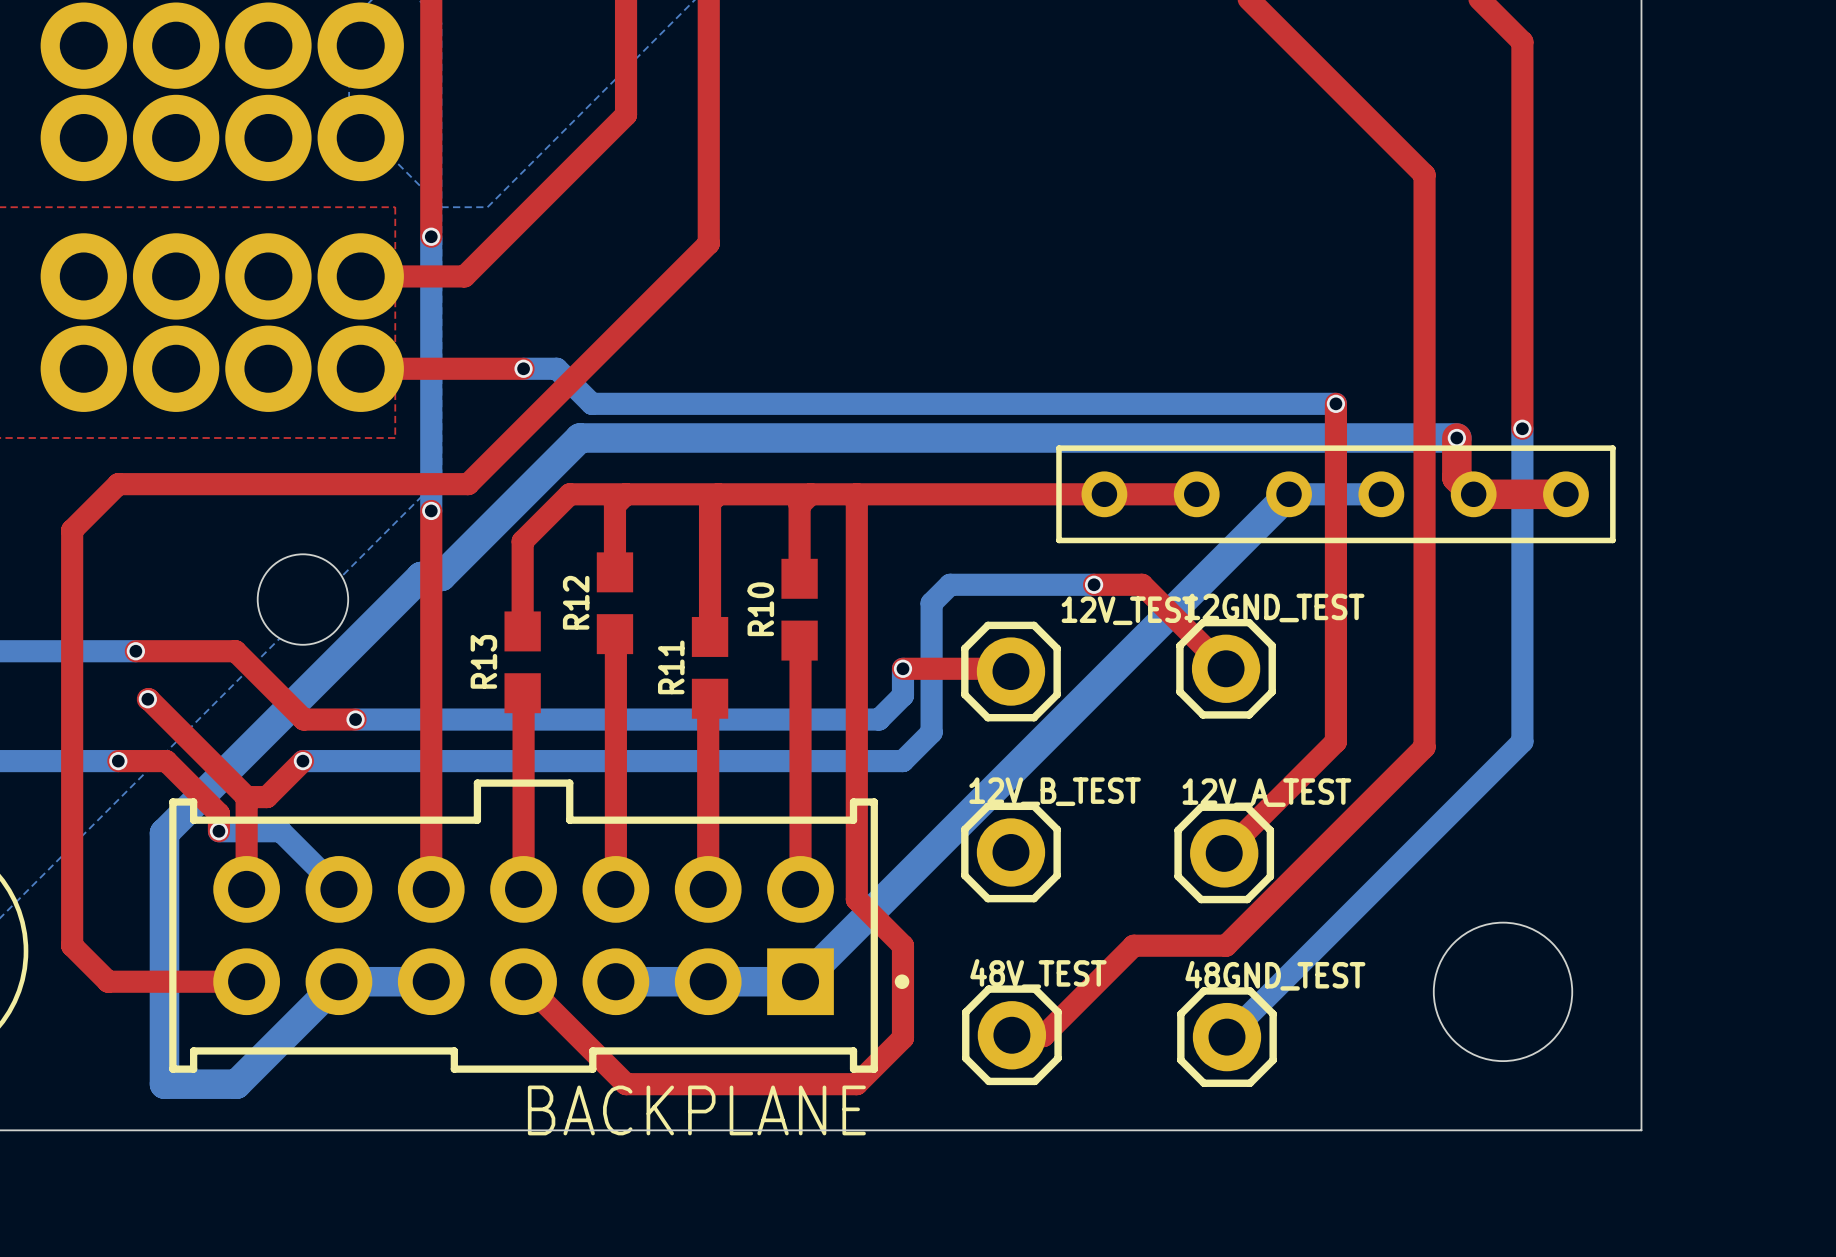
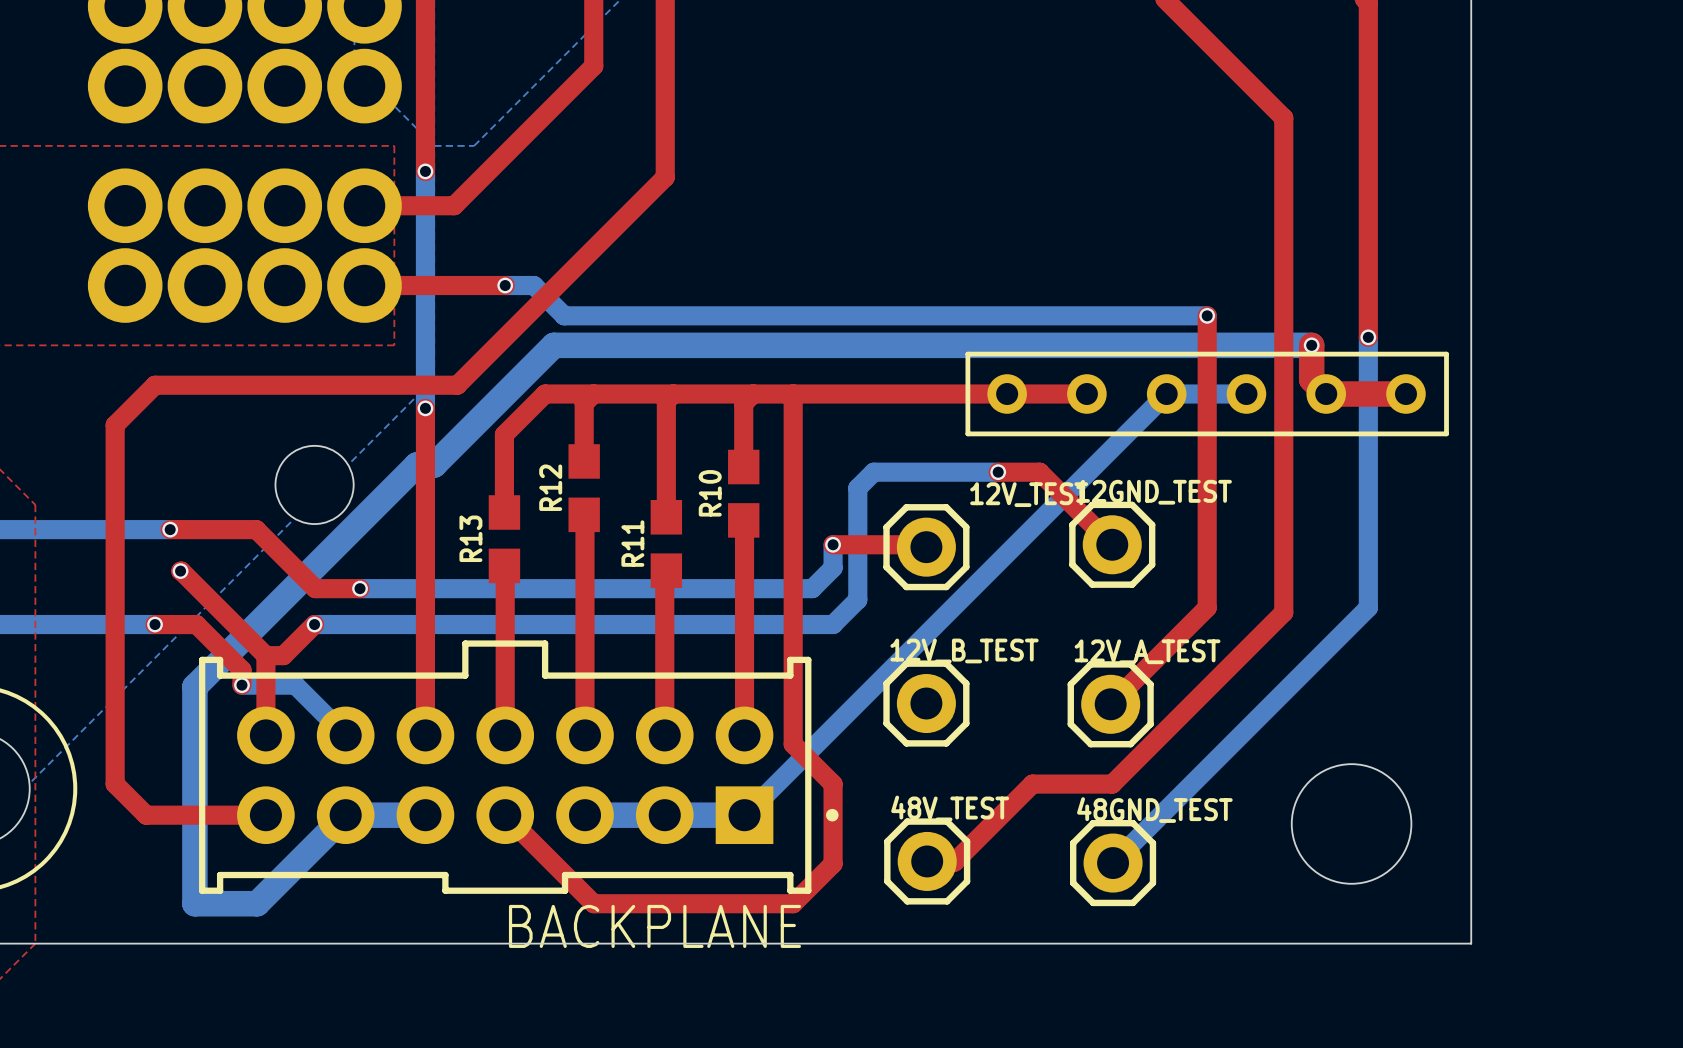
bottom track width: thick (1289, 494) (800, 981) -> thin (1166, 394) (744, 815)

